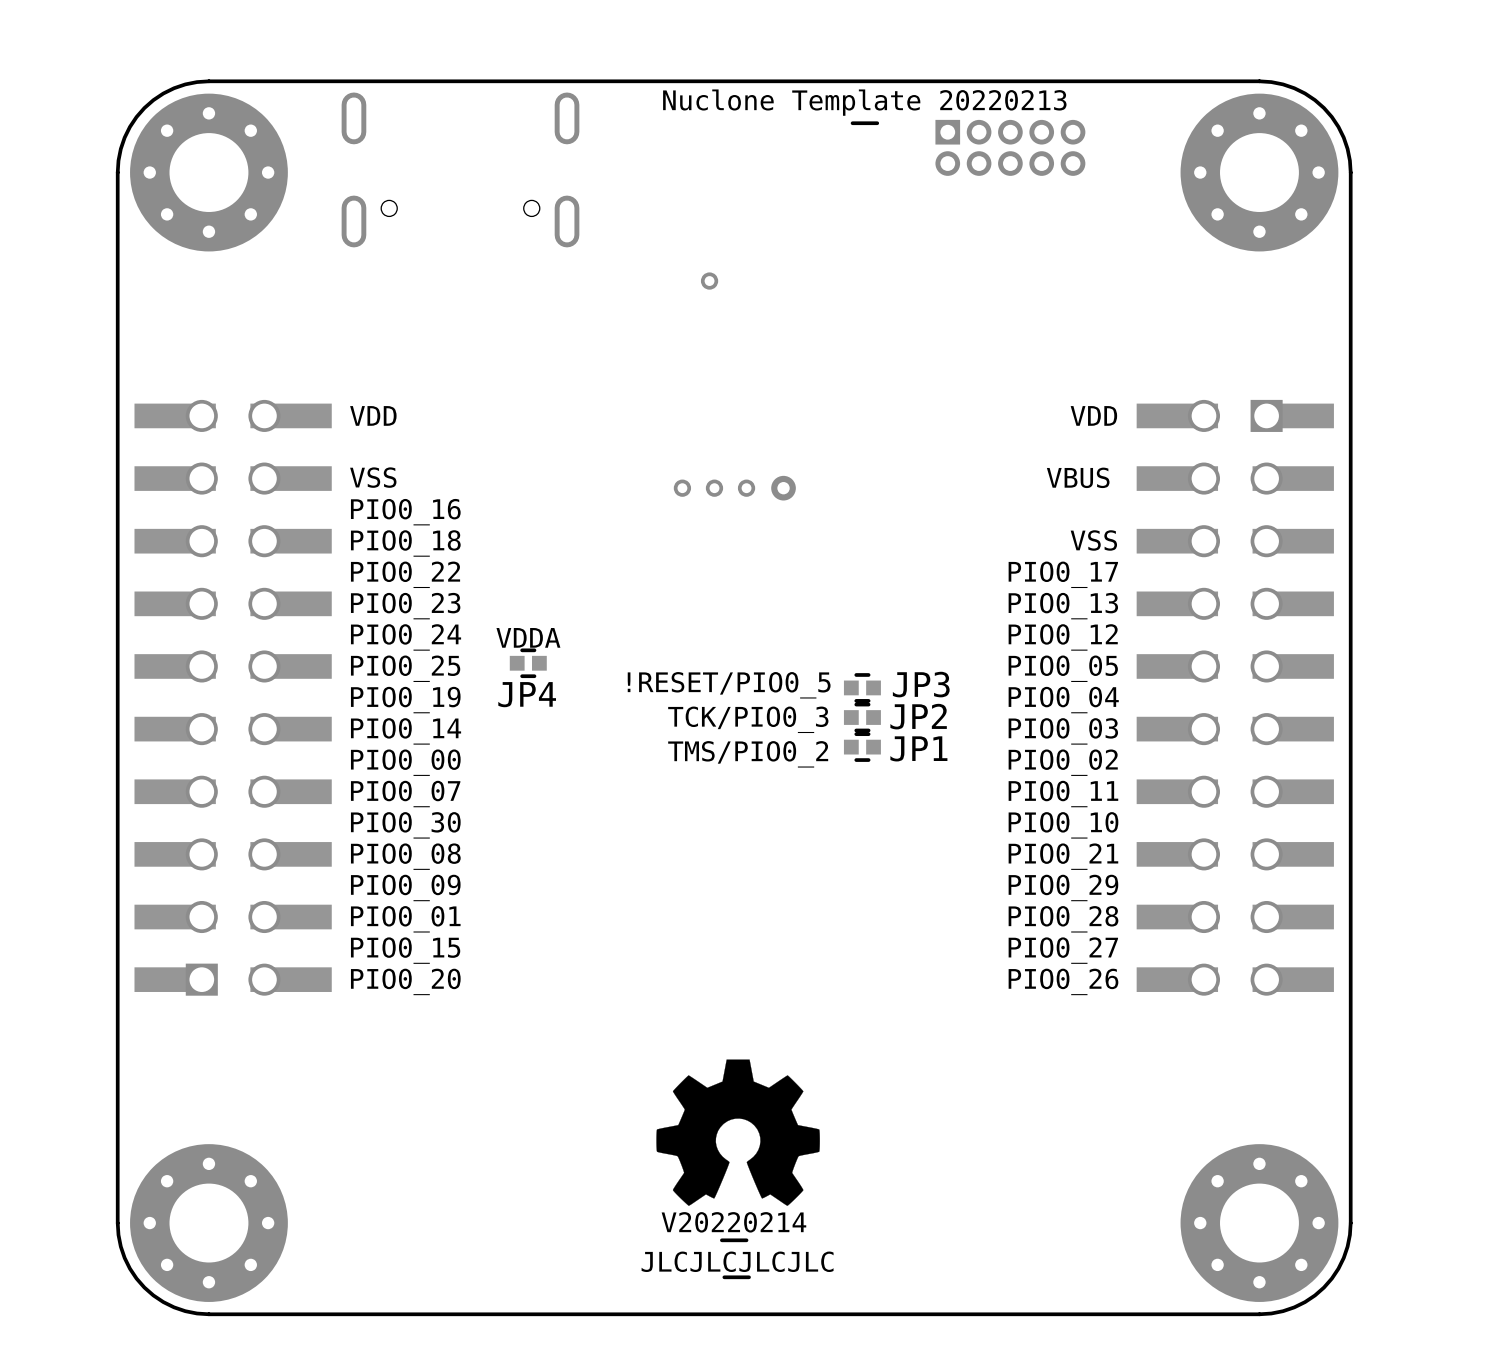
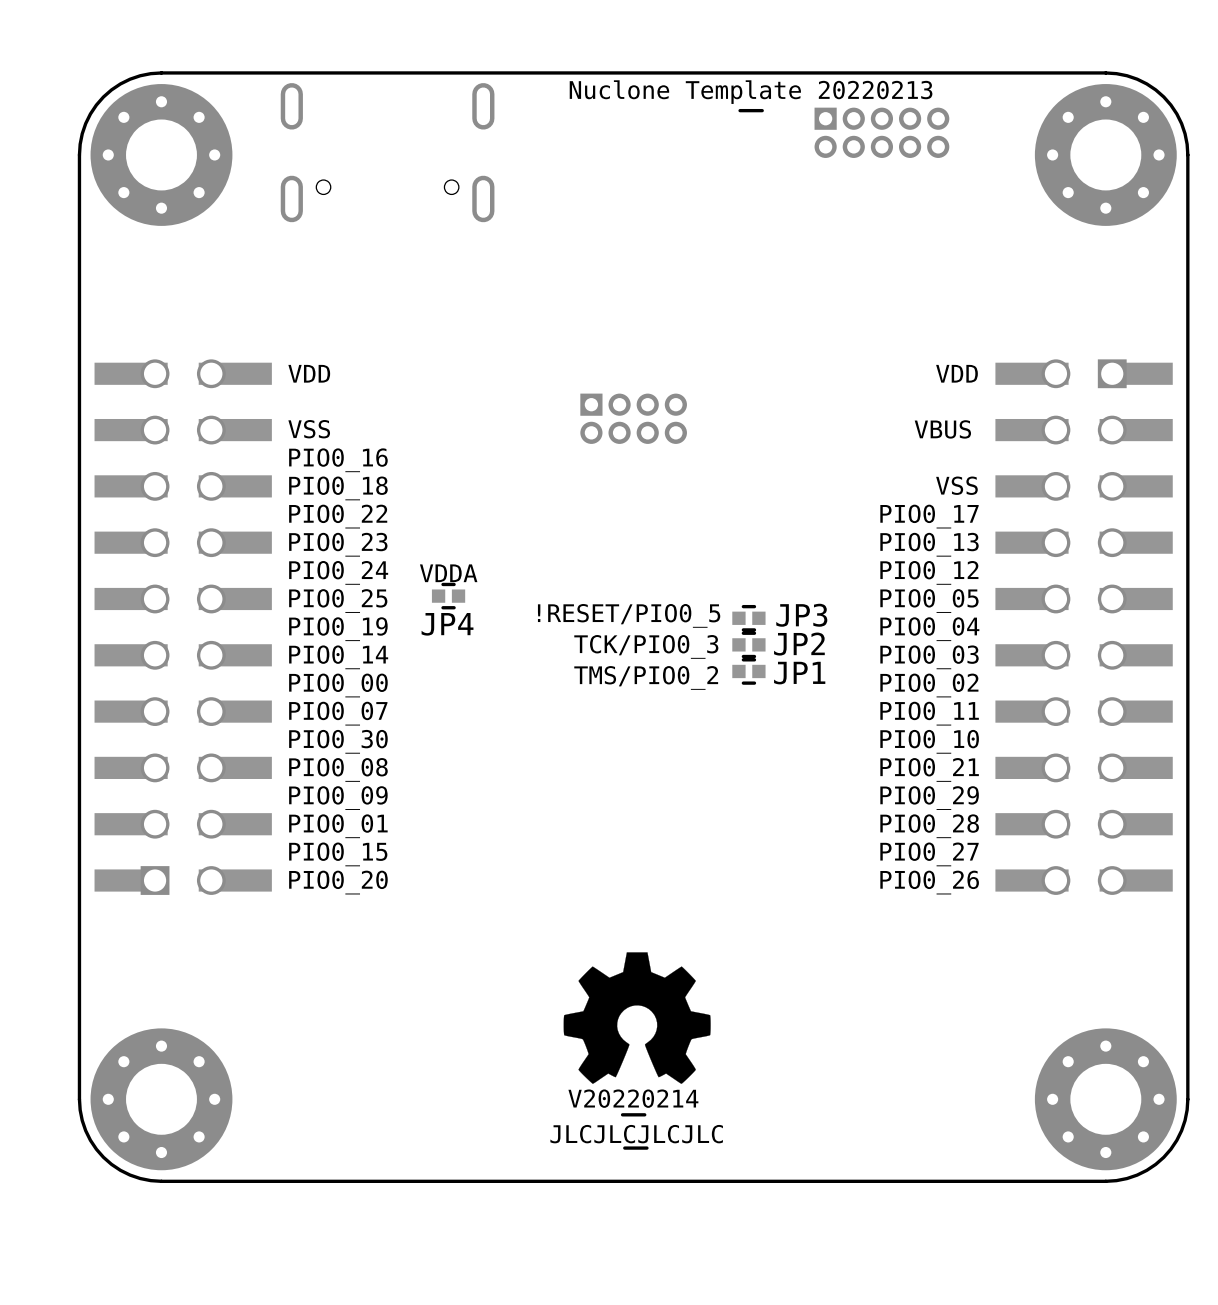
part: (709, 281) -> none
part: none -> (633, 418)
part: (682, 488) -> none
part: (714, 488) -> none
part: (746, 488) -> none
part: (783, 488) -> none

